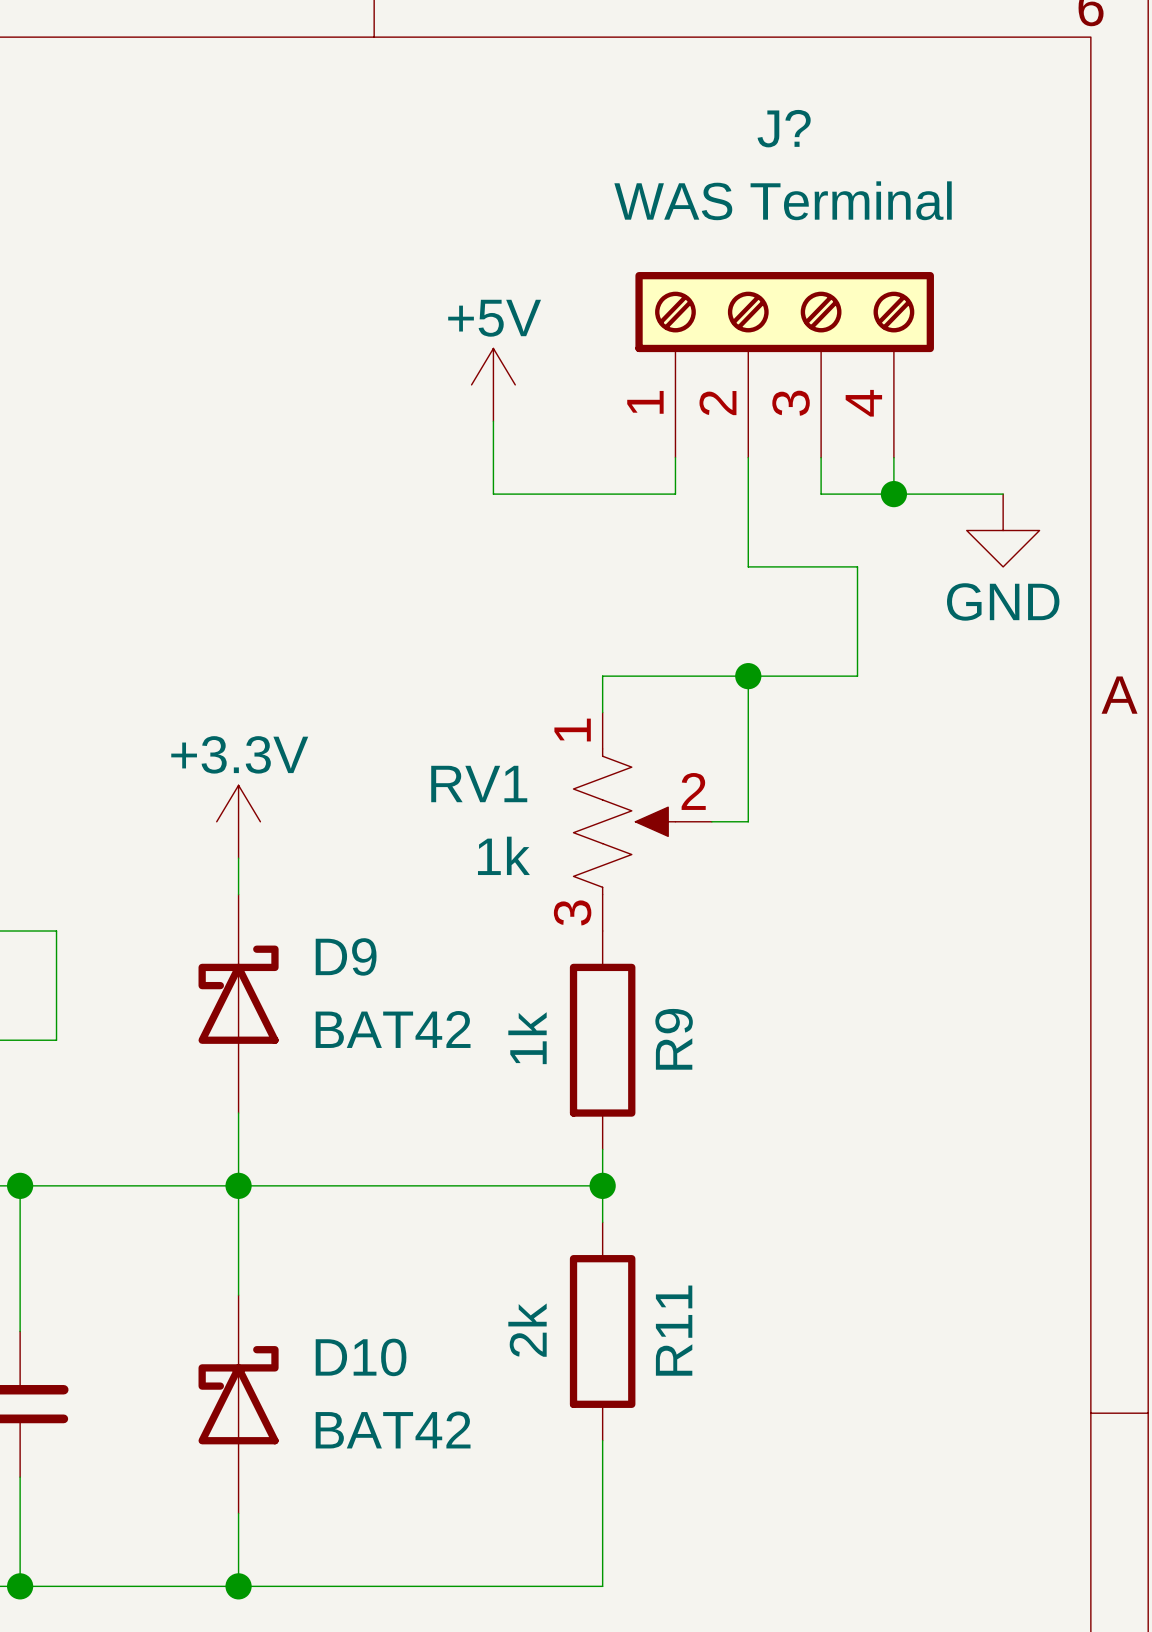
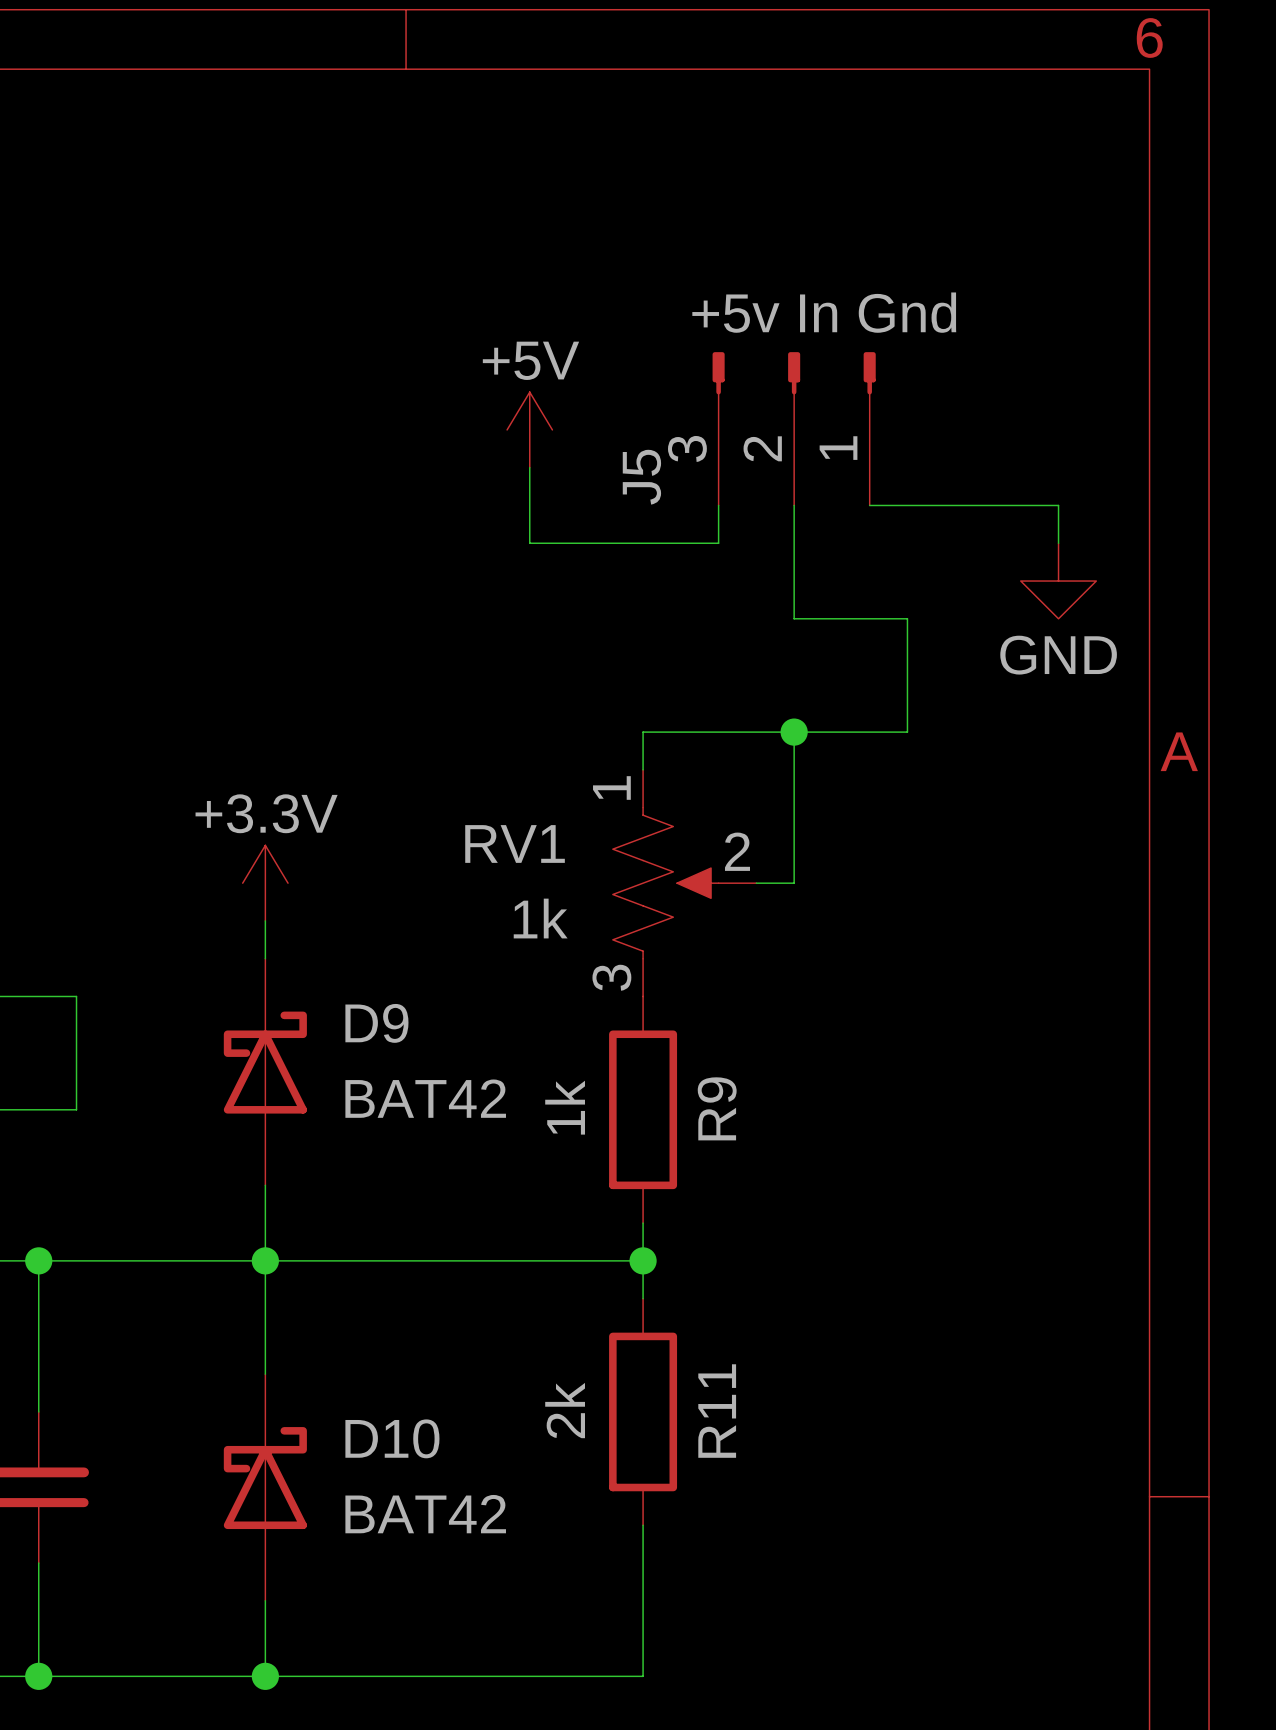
J?: WAS Terminal (784, 364) -> none
J5: none -> +5v In Gnd (794, 428)
wire: (821, 457) (821, 494) (1003, 494) -> (869, 505) (1058, 505) (1058, 543)
wire: (893, 457) (893, 494) -> none
junction: (893, 494) -> none

